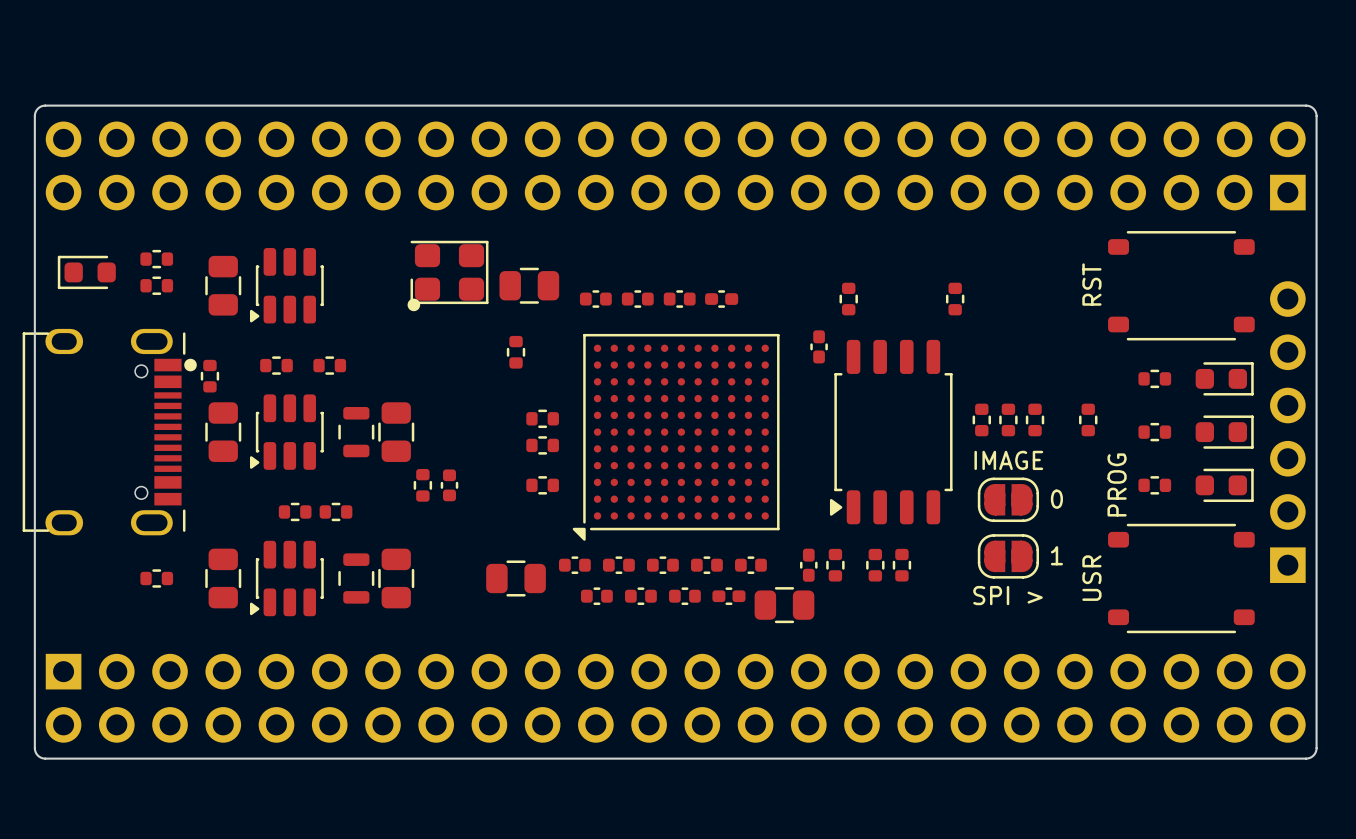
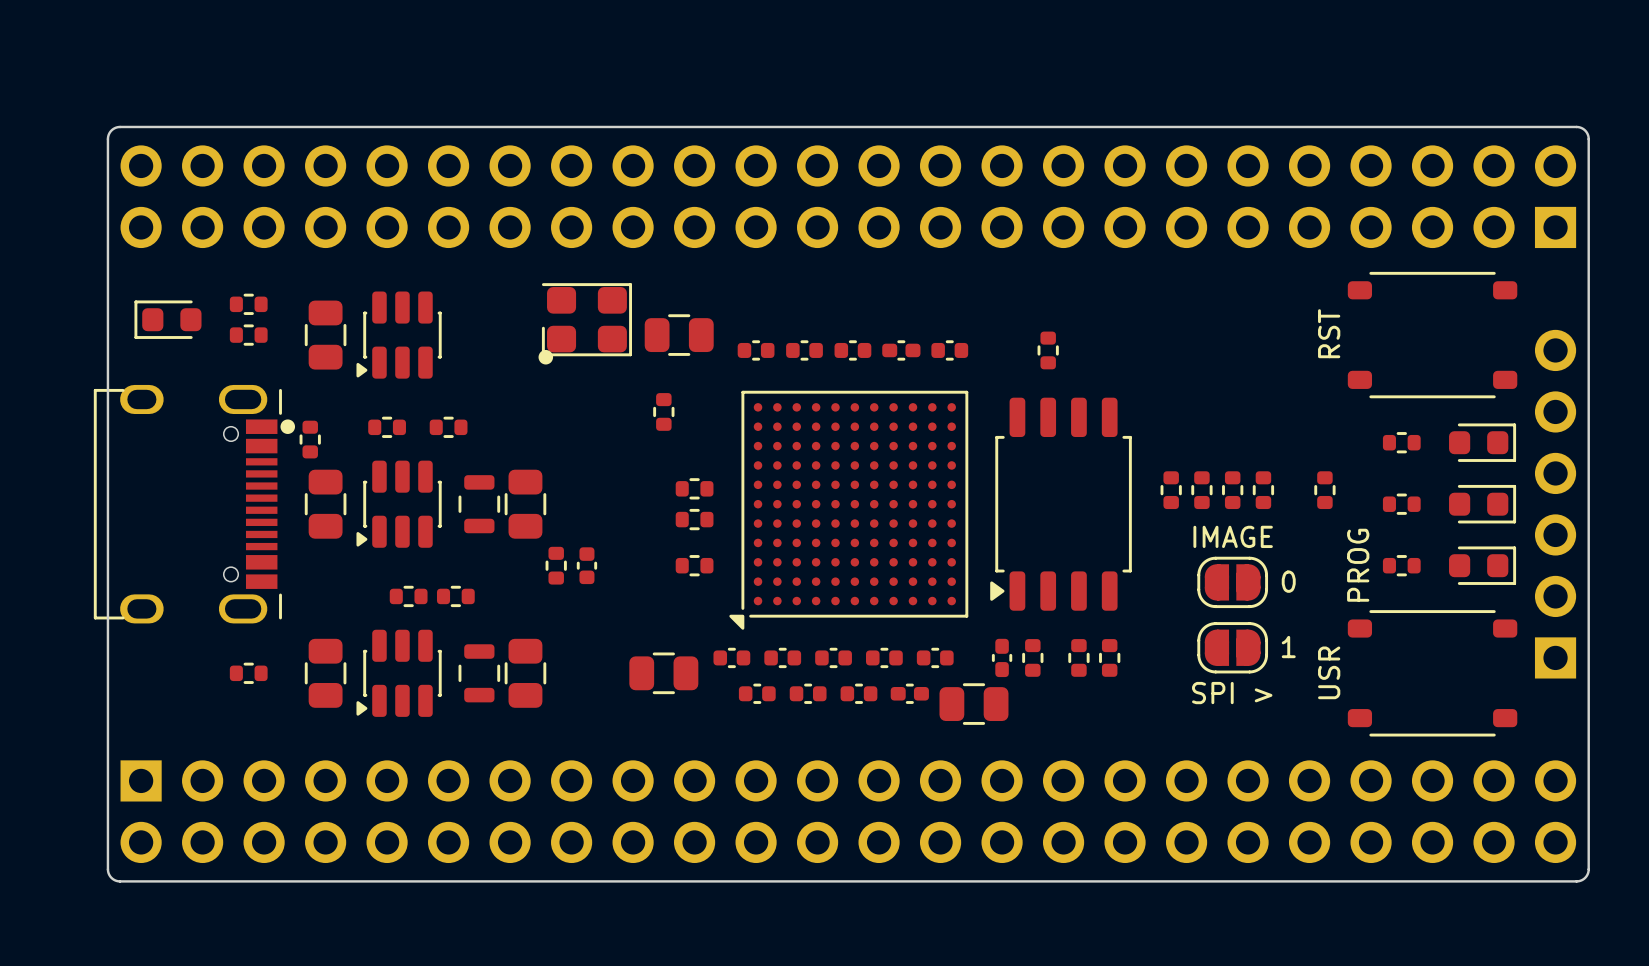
part: none -> (949, 350)
part position: (955, 299) -> (1171, 490)
part: (819, 346) -> none
part position: (891, 432) -> (1061, 504)

